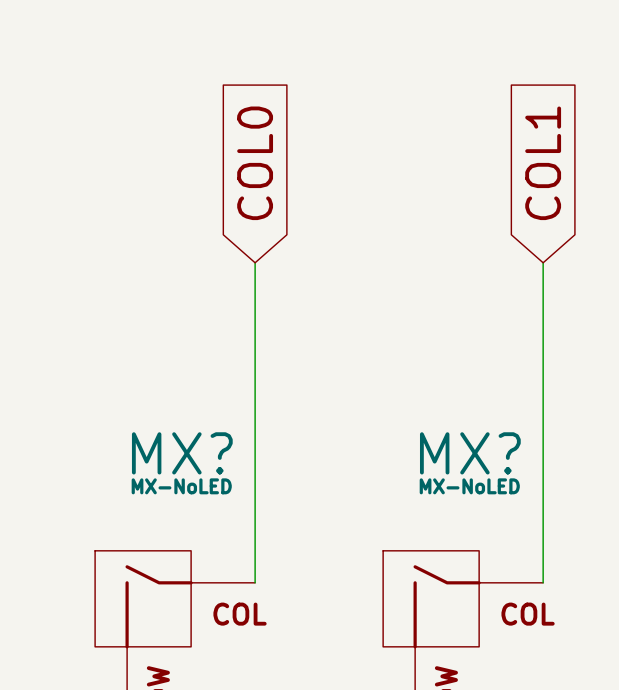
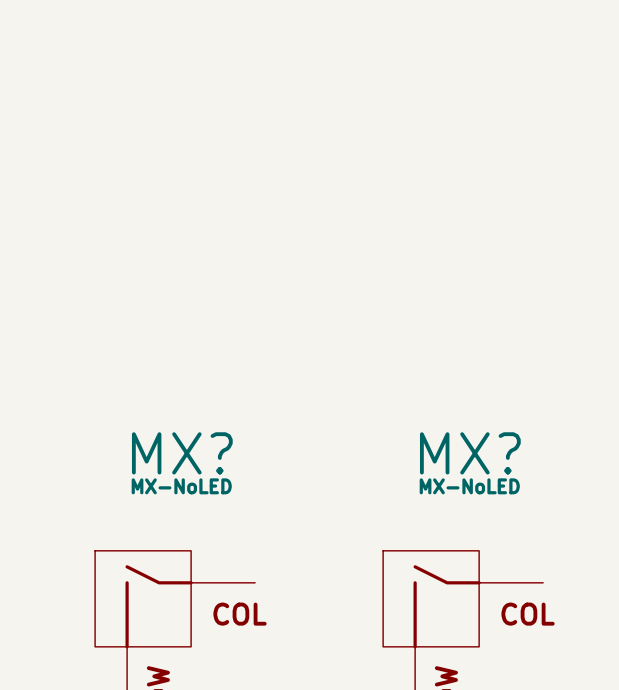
global label: COL0 (255, 163) -> none
global label: COL1 (543, 163) -> none
wire: (255, 262) (255, 582) -> none
wire: (543, 262) (543, 582) -> none

